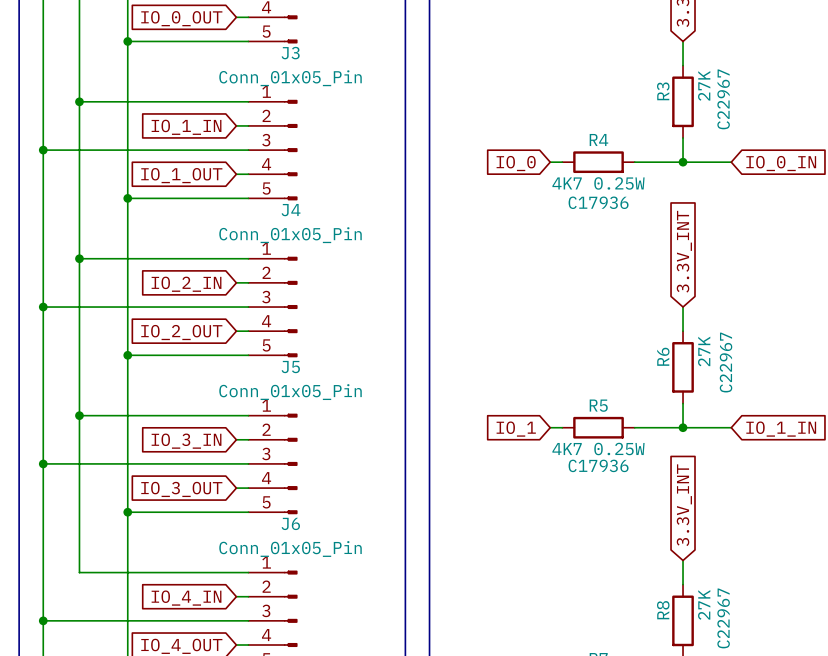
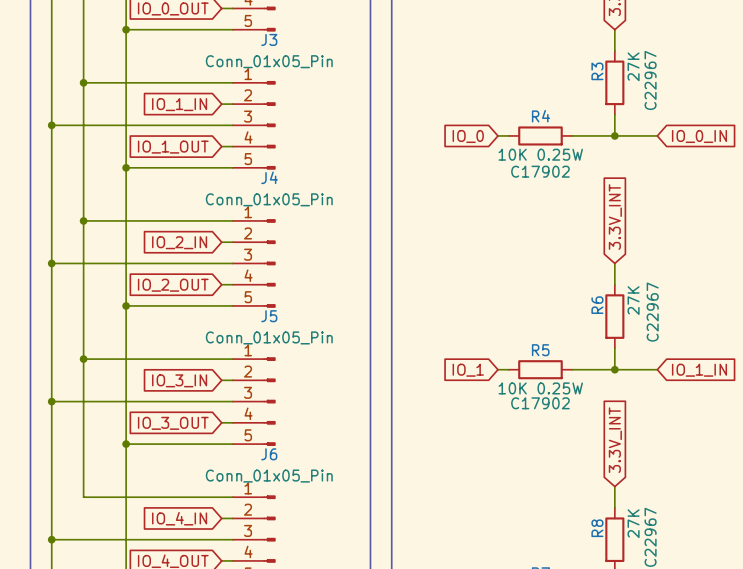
R4 value: 4K7 0.25W (598, 183) -> 10K 0.25W (540, 154)
R4 text: C17936 (598, 202) -> C17902 (540, 171)
R5 value: 4K7 0.25W (598, 449) -> 10K 0.25W (540, 388)
R5 text: C17936 (598, 465) -> C17902 (540, 403)

